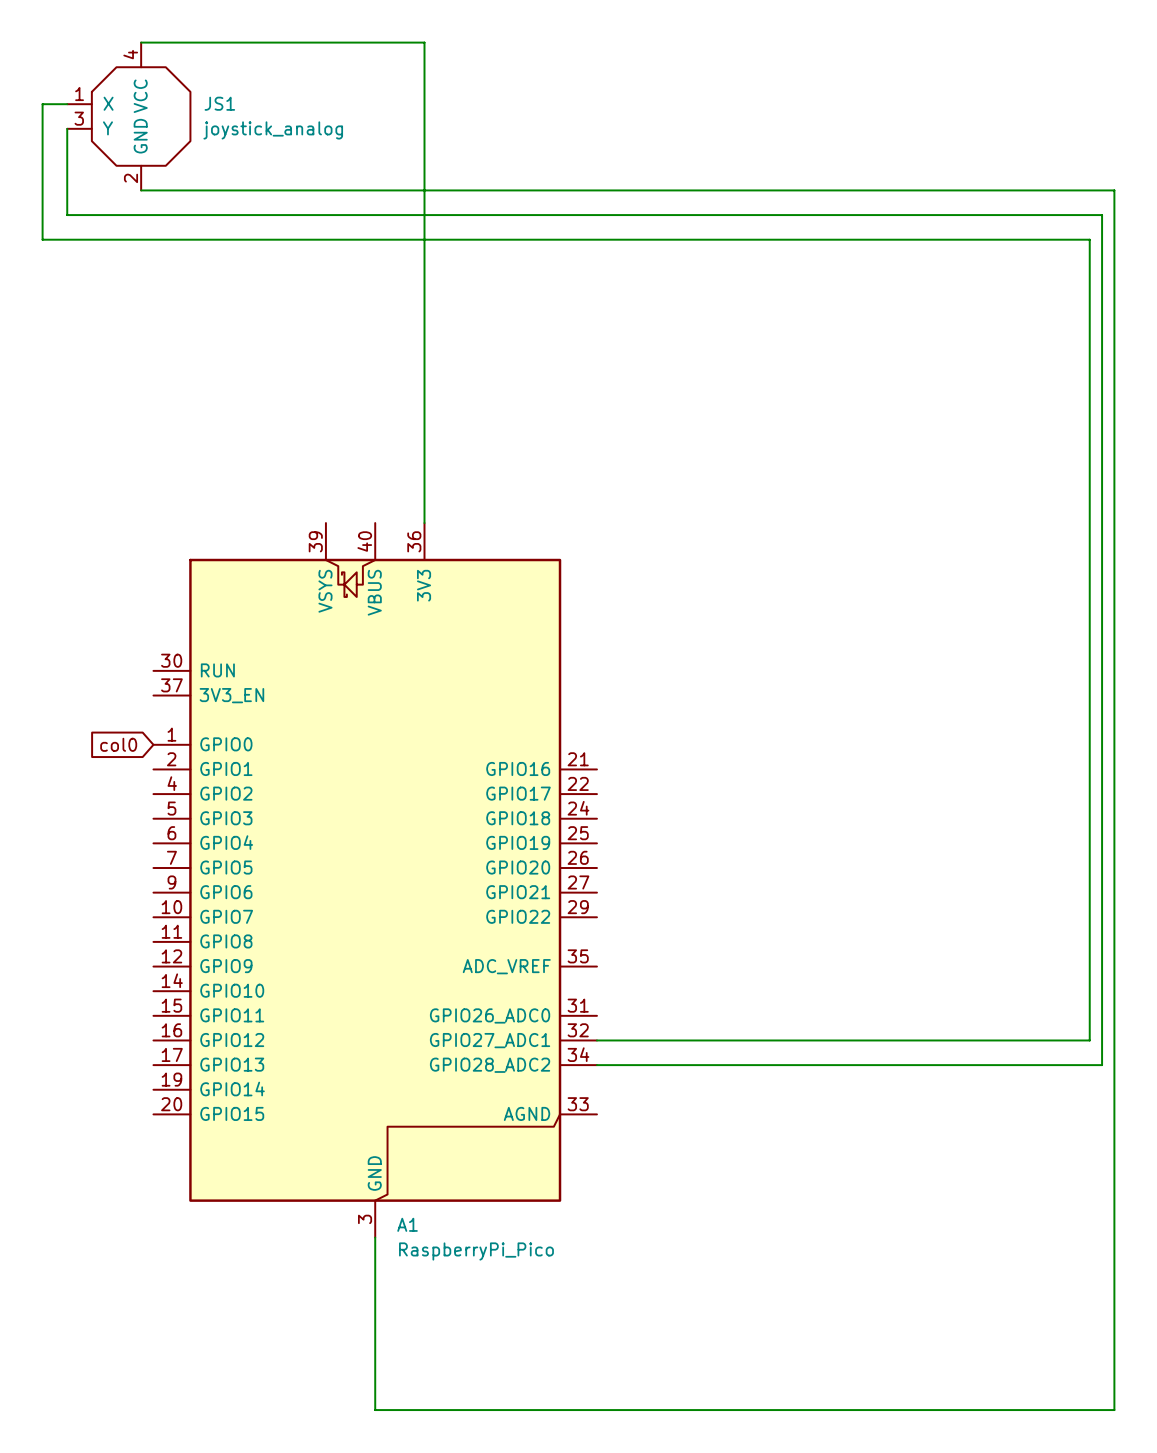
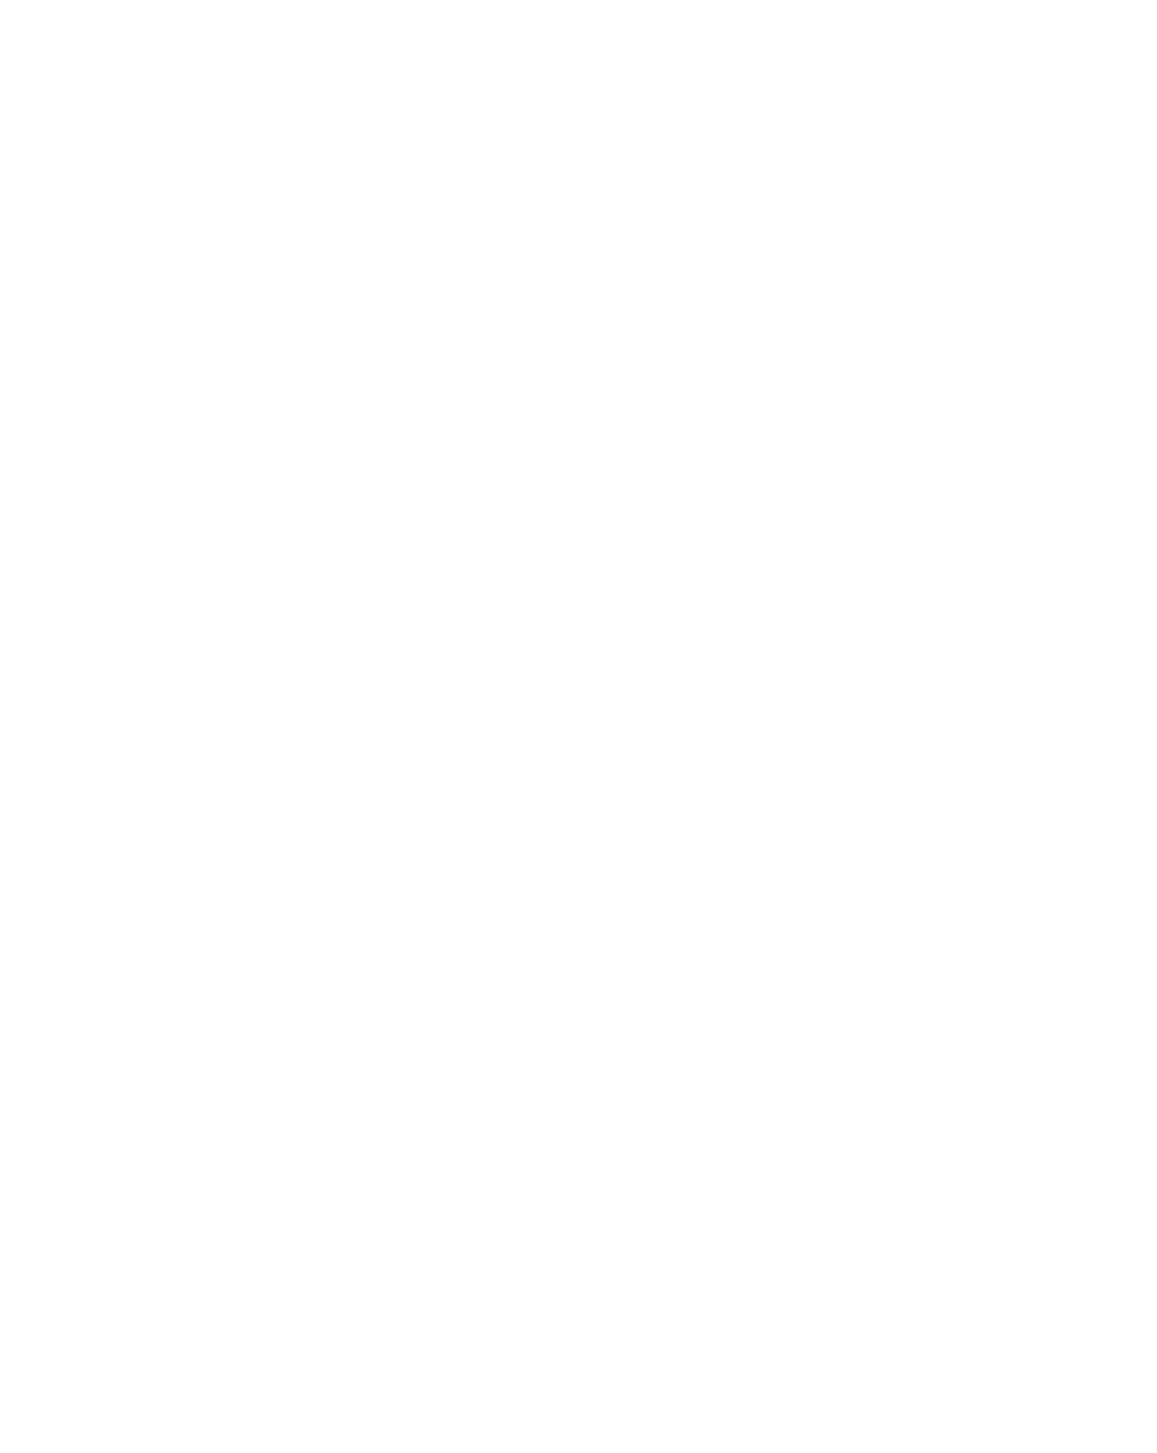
wire: (141, 42) (424, 42) (424, 523) -> none
wire: (67, 104) (42, 104) (42, 239) (1089, 239) (1089, 1040) (596, 1040) -> none
JS1: joystick_analog (128, 116) -> none
wire: (67, 128) (67, 215) (1102, 215) (1102, 1065) (596, 1065) -> none
wire: (141, 190) (1114, 190) (1114, 1410) (375, 1410) (375, 1237) -> none
global label: col0 (118, 744) -> none
A1: RaspberryPi_Pico (375, 880) -> none

